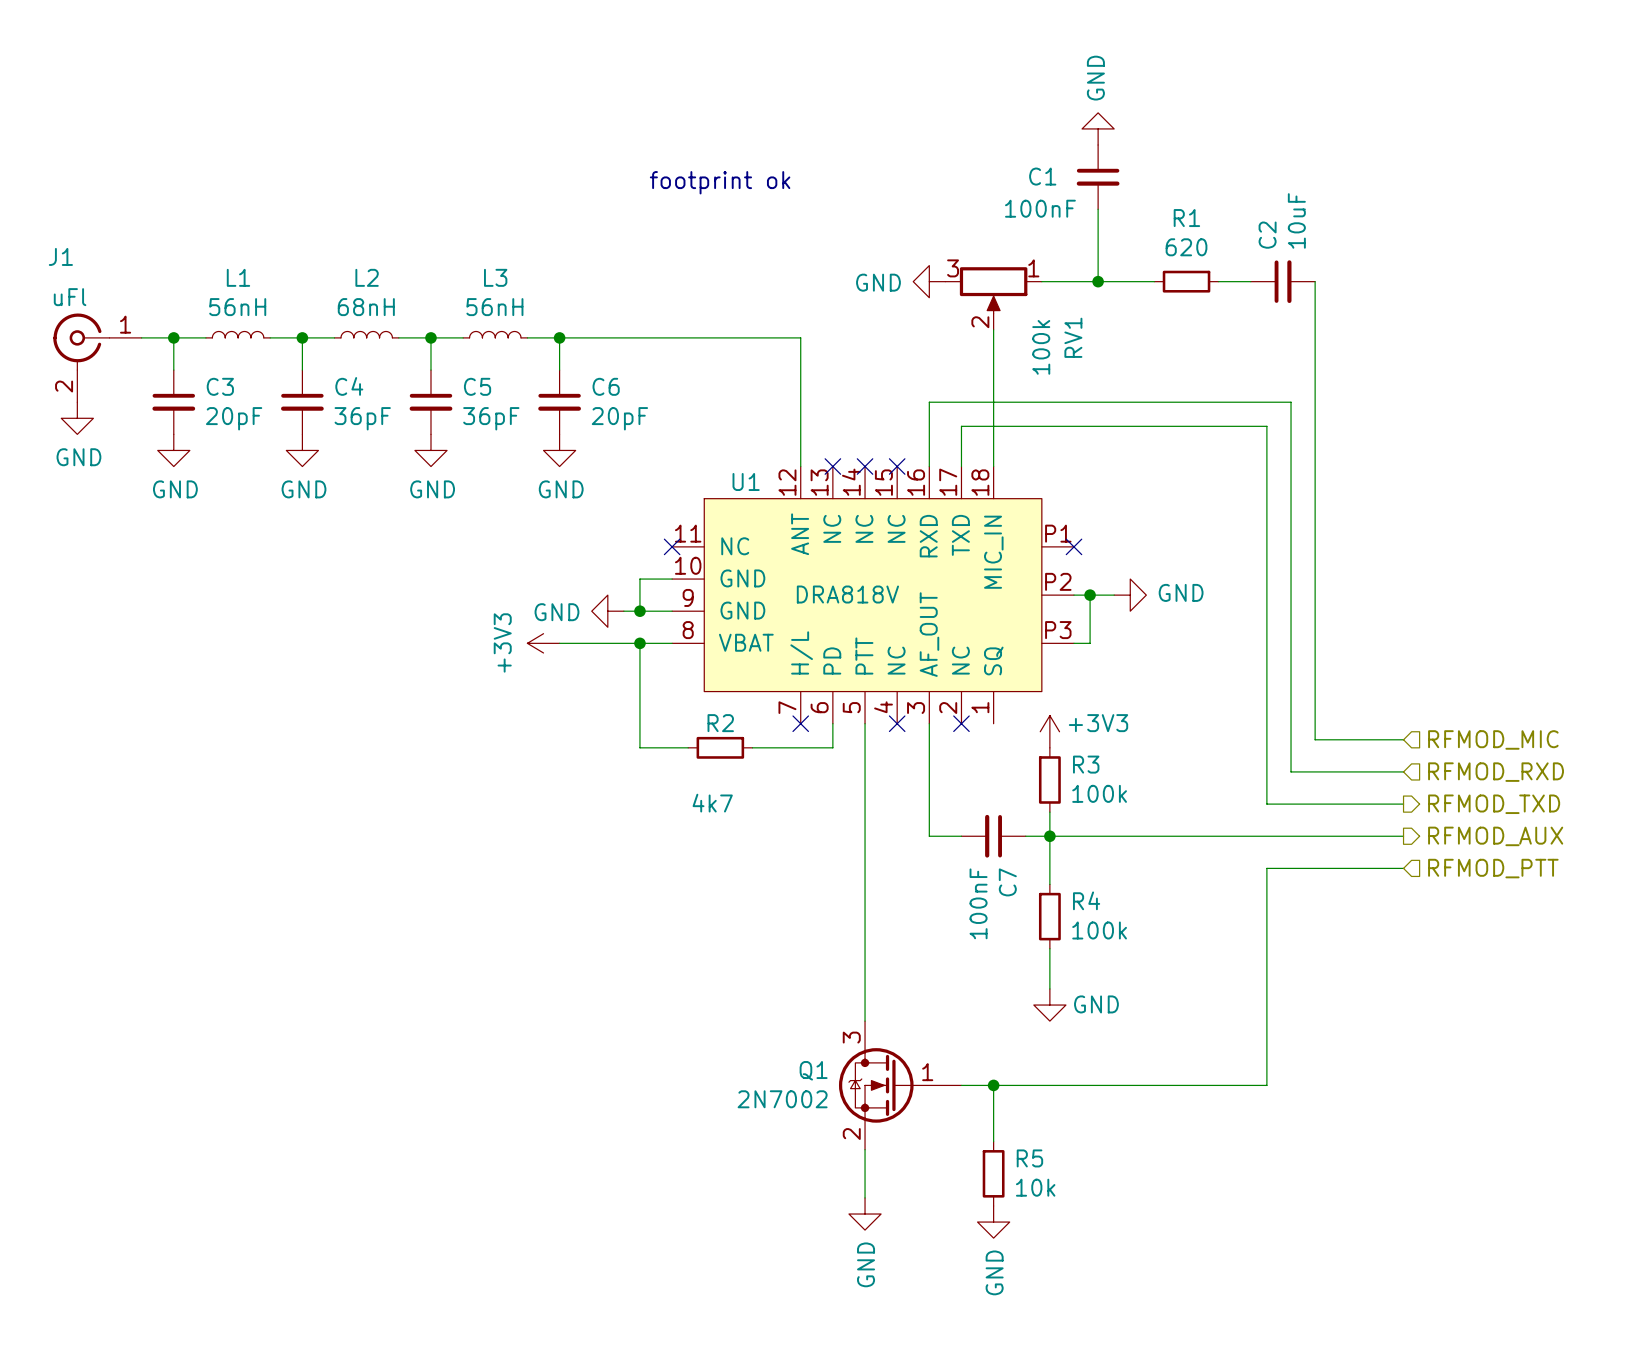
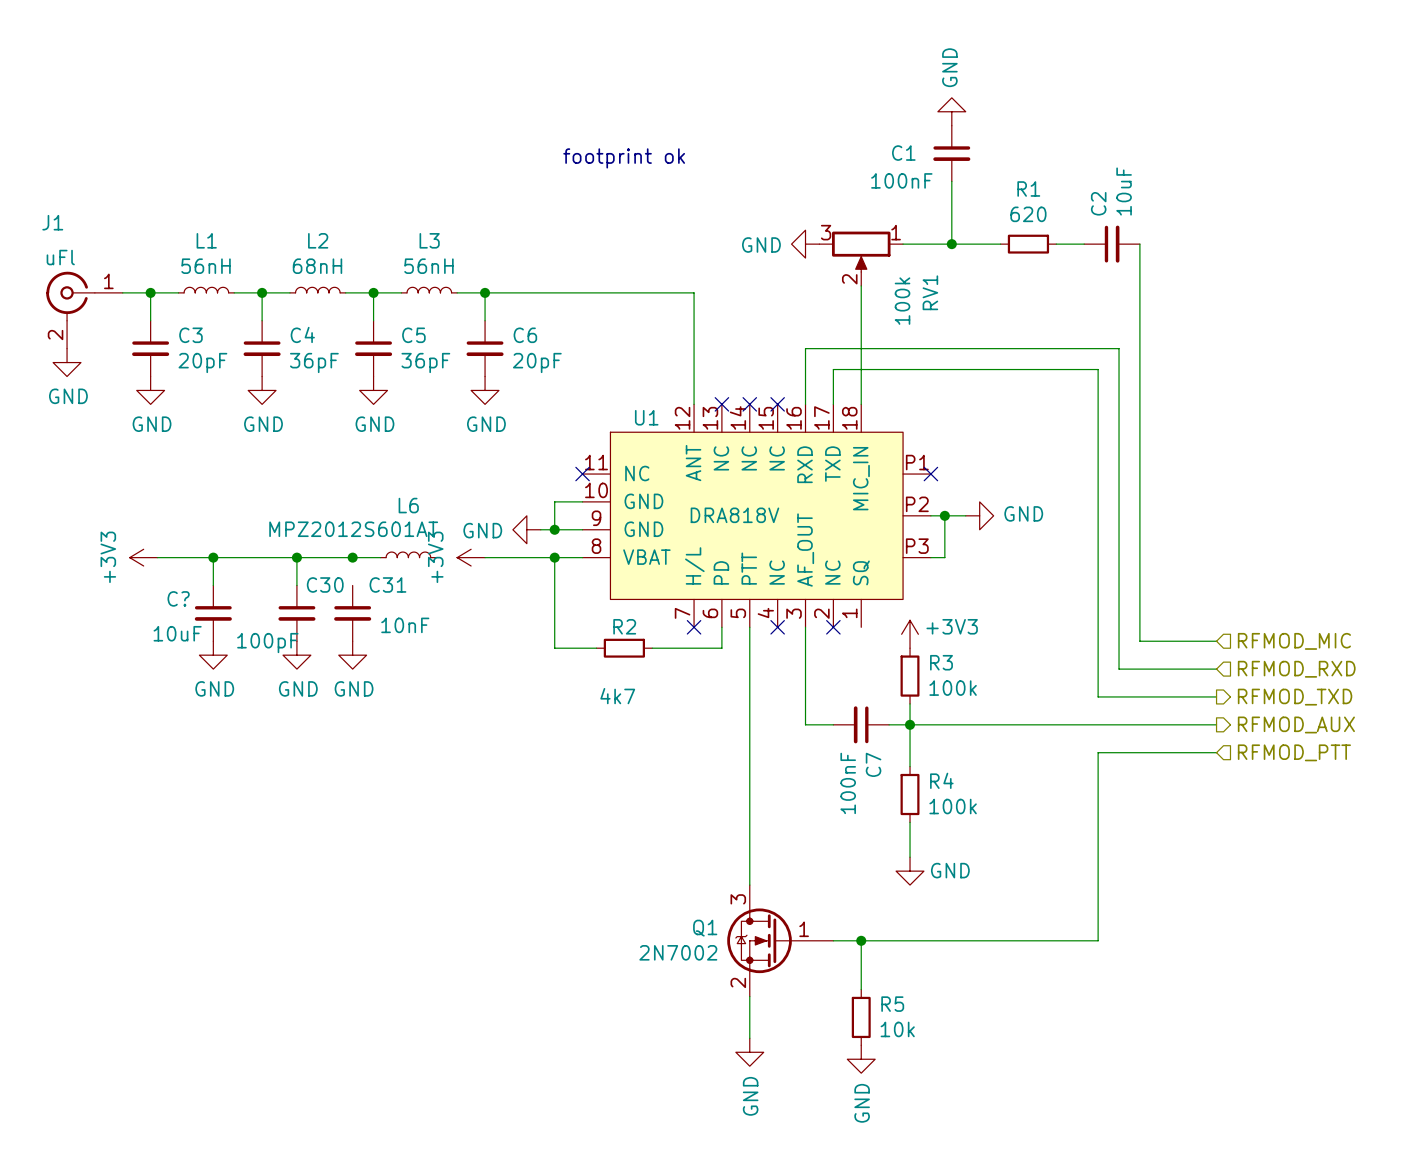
L6: none -> MPZ2012S601AT (408, 554)
power symbol: none -> +3V3 (143, 557)
wire: none -> (157, 557) (380, 557)
wire: none -> (213, 557) (213, 585)
junction: none -> (213, 557)
wire: none -> (296, 557) (296, 585)
junction: none -> (296, 557)
junction: none -> (352, 557)
C?: none -> 10uF (213, 613)
C30: none -> 100pF (296, 613)
C31: none -> 10nF (352, 613)
power symbol: none -> GND (213, 655)
power symbol: none -> GND (296, 655)
power symbol: none -> GND (352, 655)

